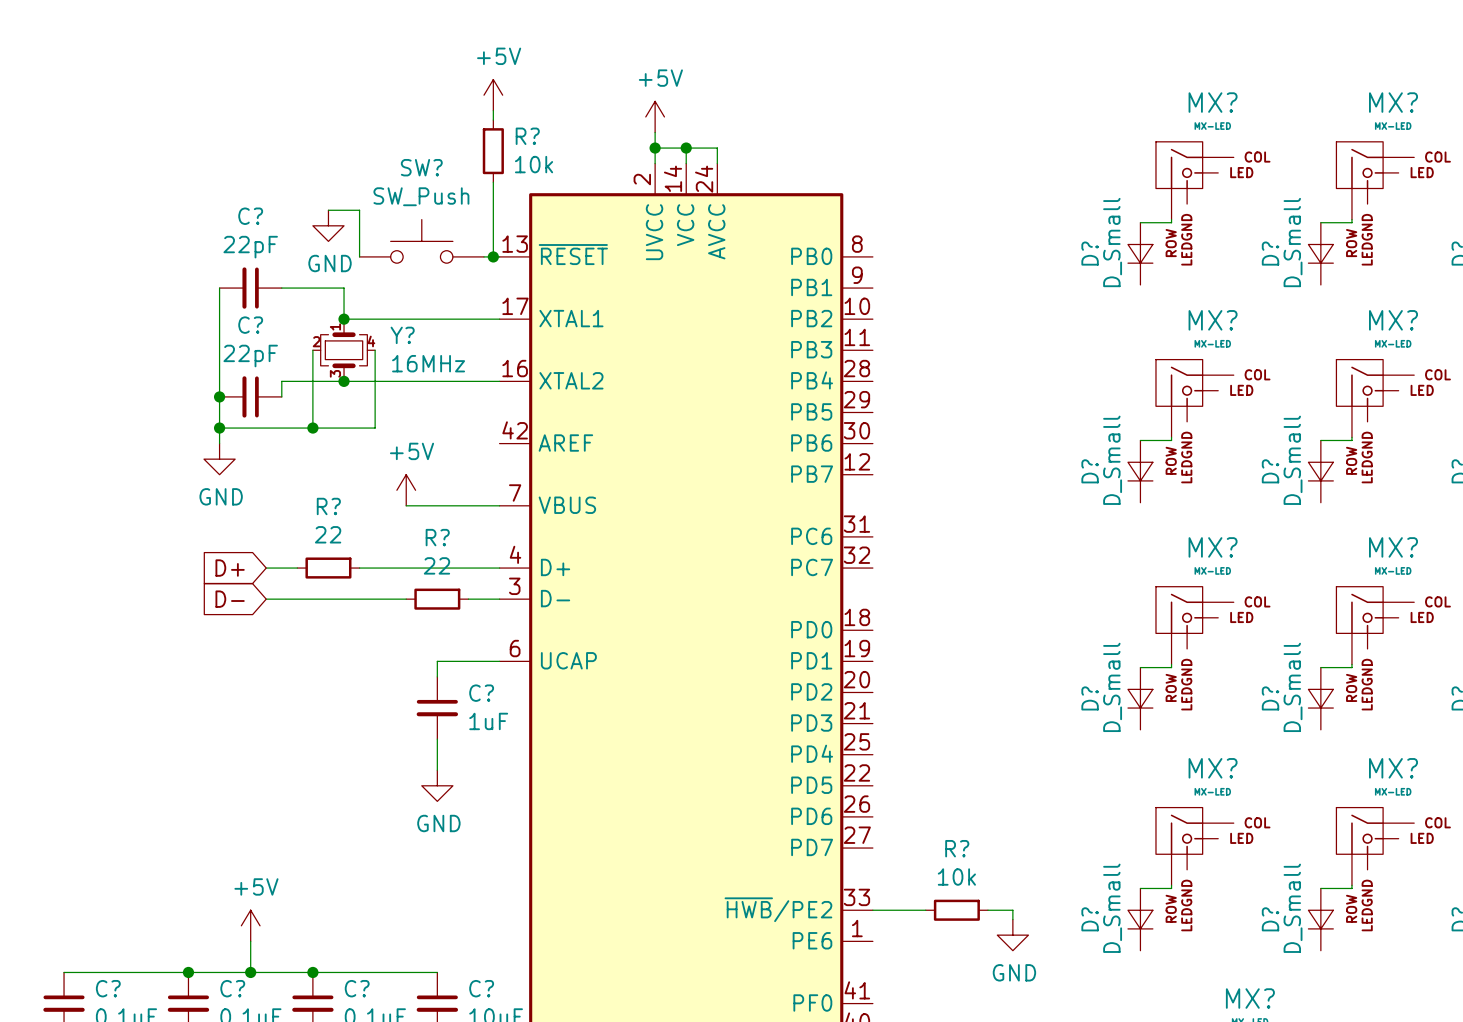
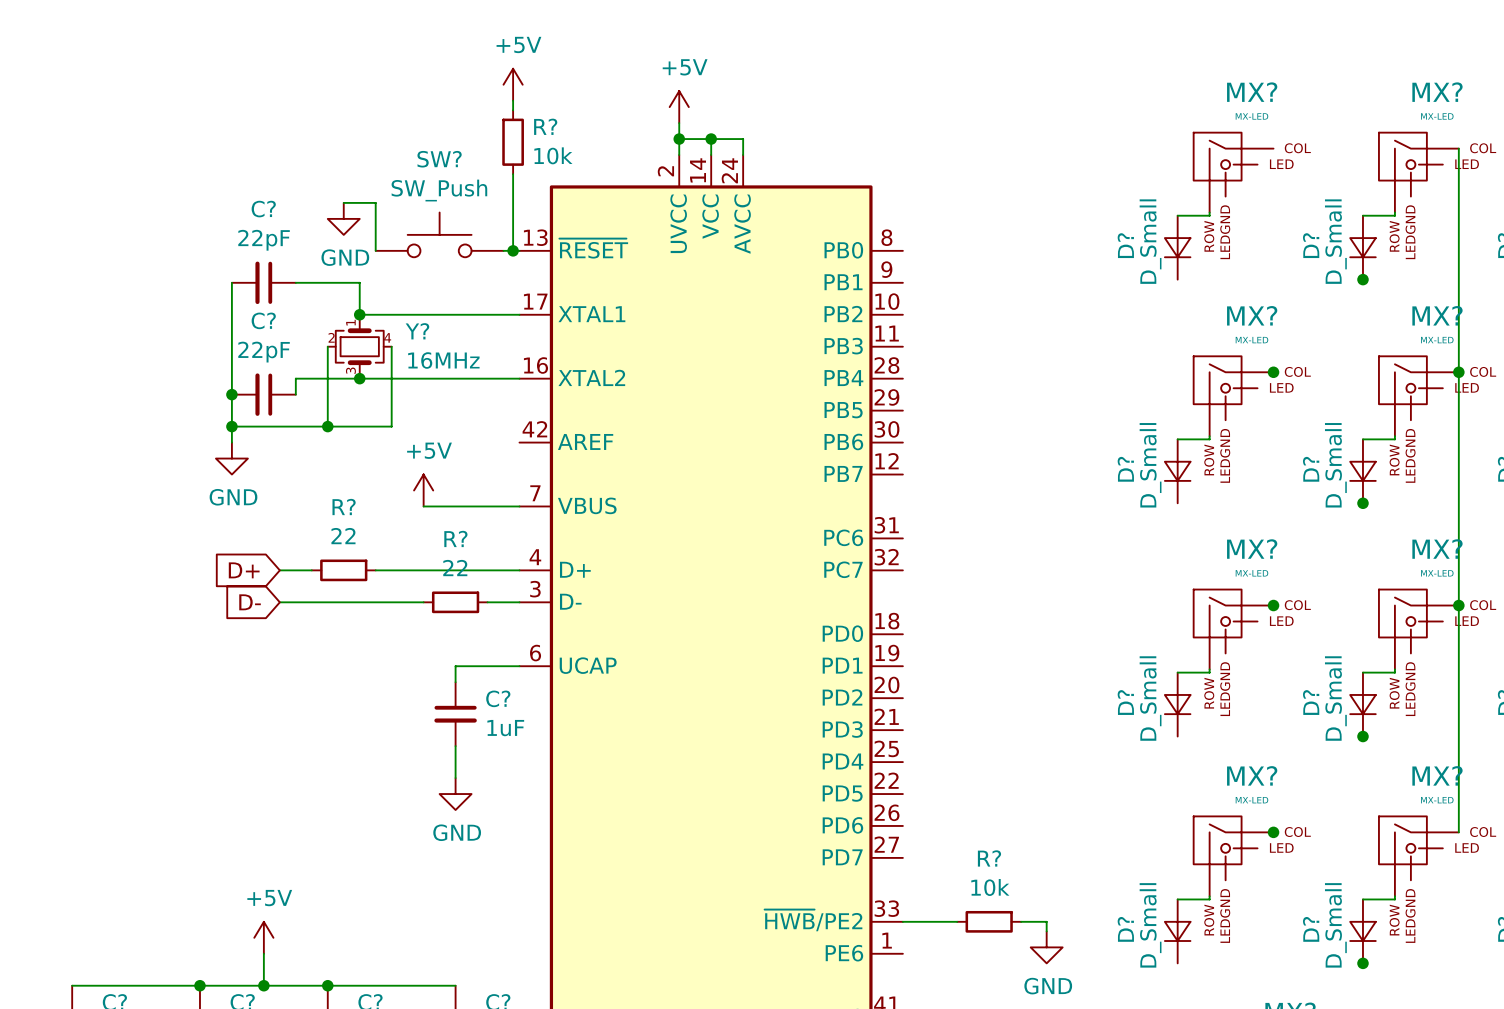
wire: none -> (1458, 148) (1458, 832)
junction: none -> (1362, 279)
junction: none -> (1273, 372)
junction: none -> (1458, 372)
junction: none -> (1362, 503)
junction: none -> (1273, 605)
junction: none -> (1458, 605)
junction: none -> (1362, 736)
junction: none -> (1273, 832)
junction: none -> (1362, 963)

